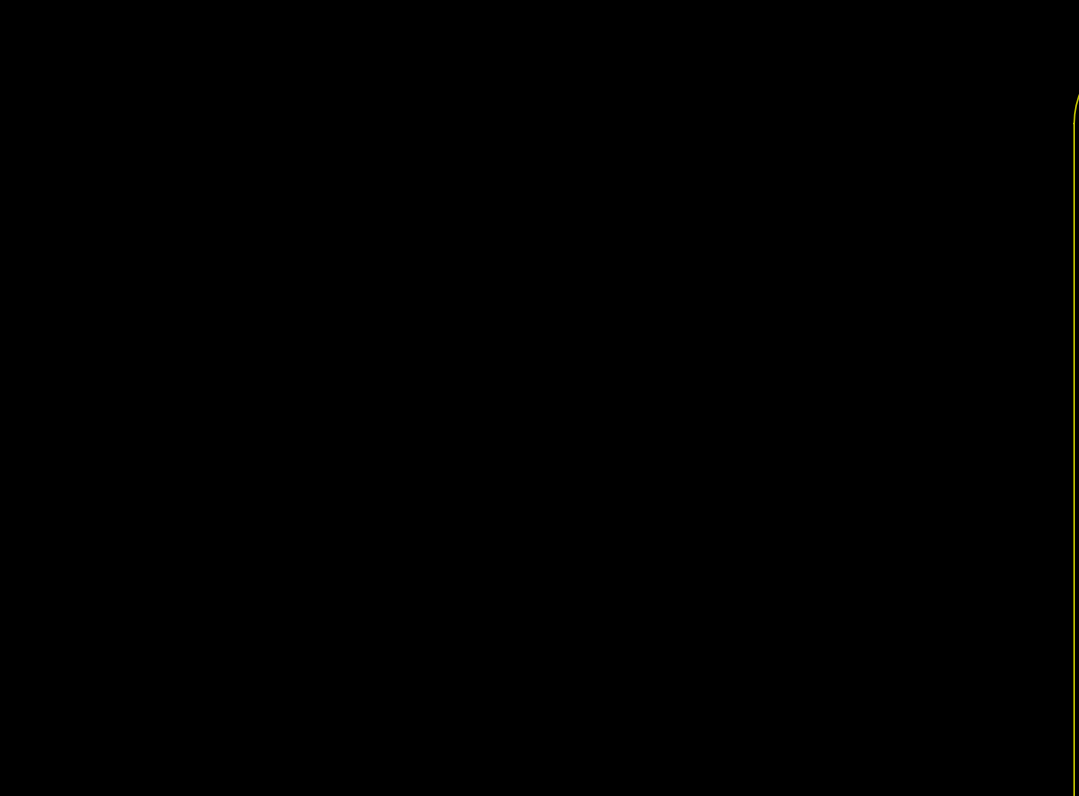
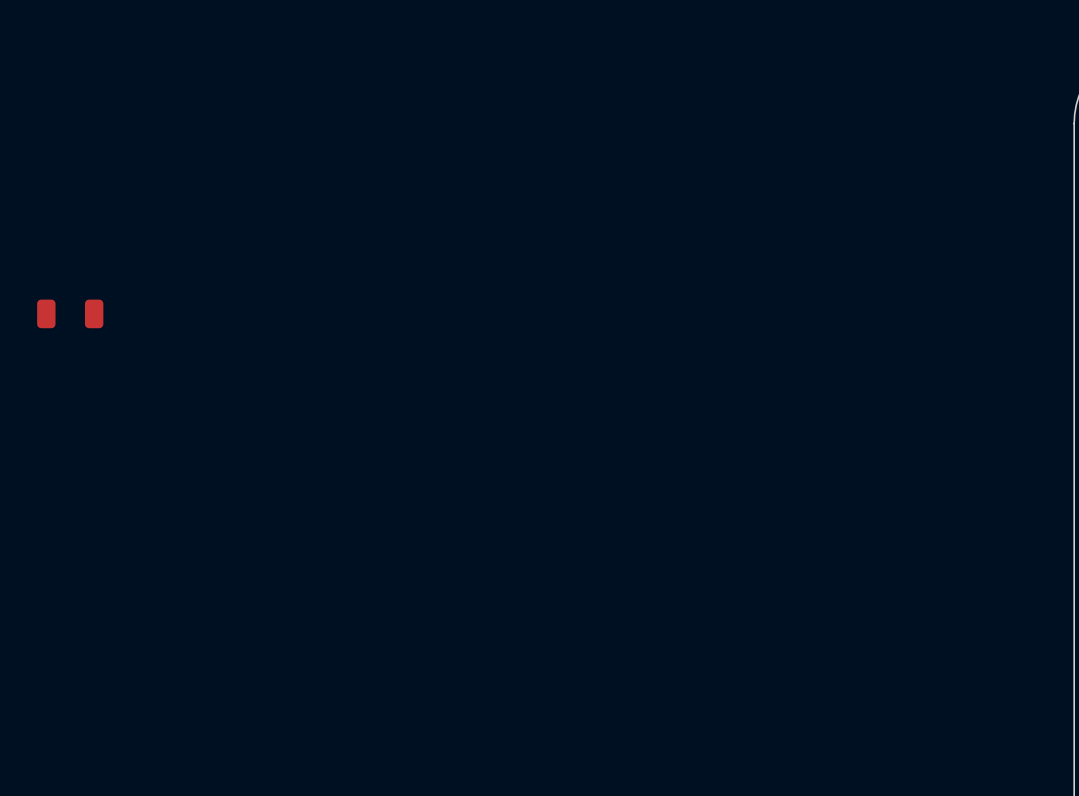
part: none -> (70, 313)

